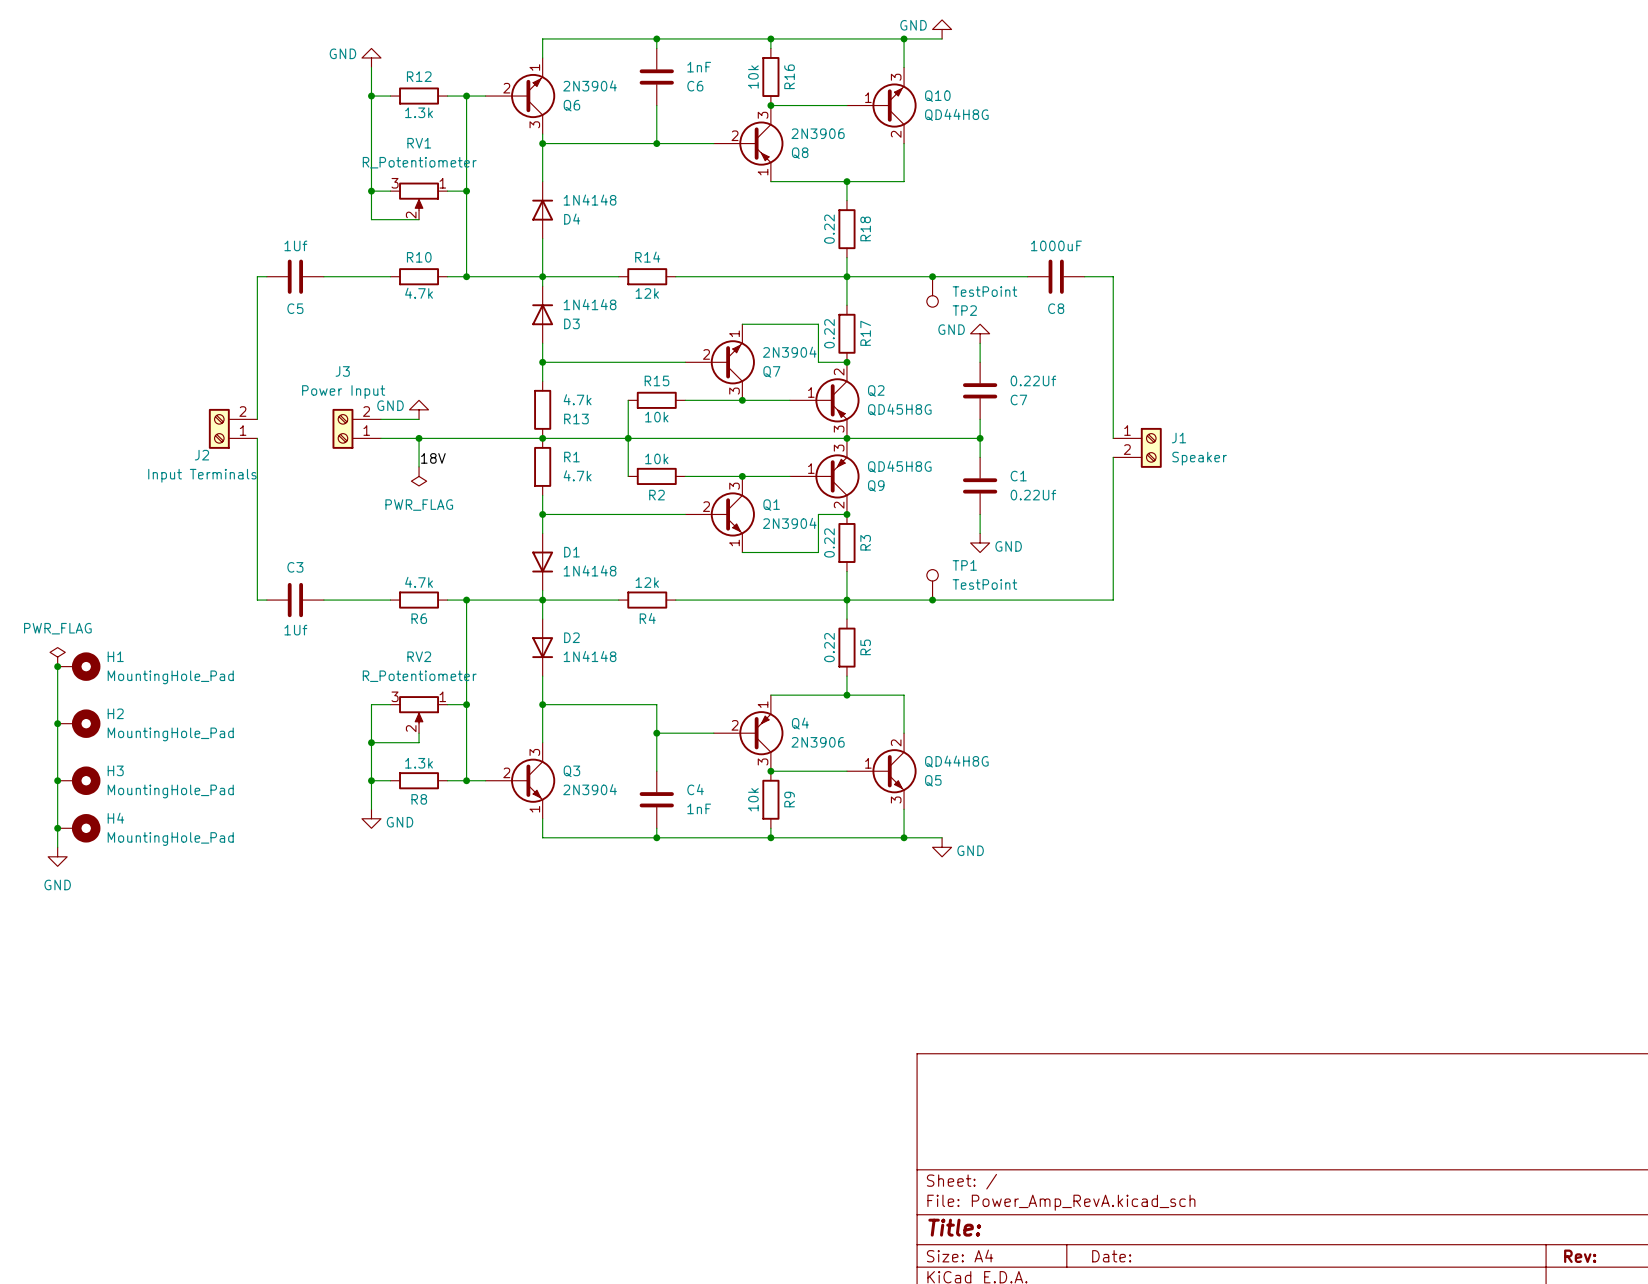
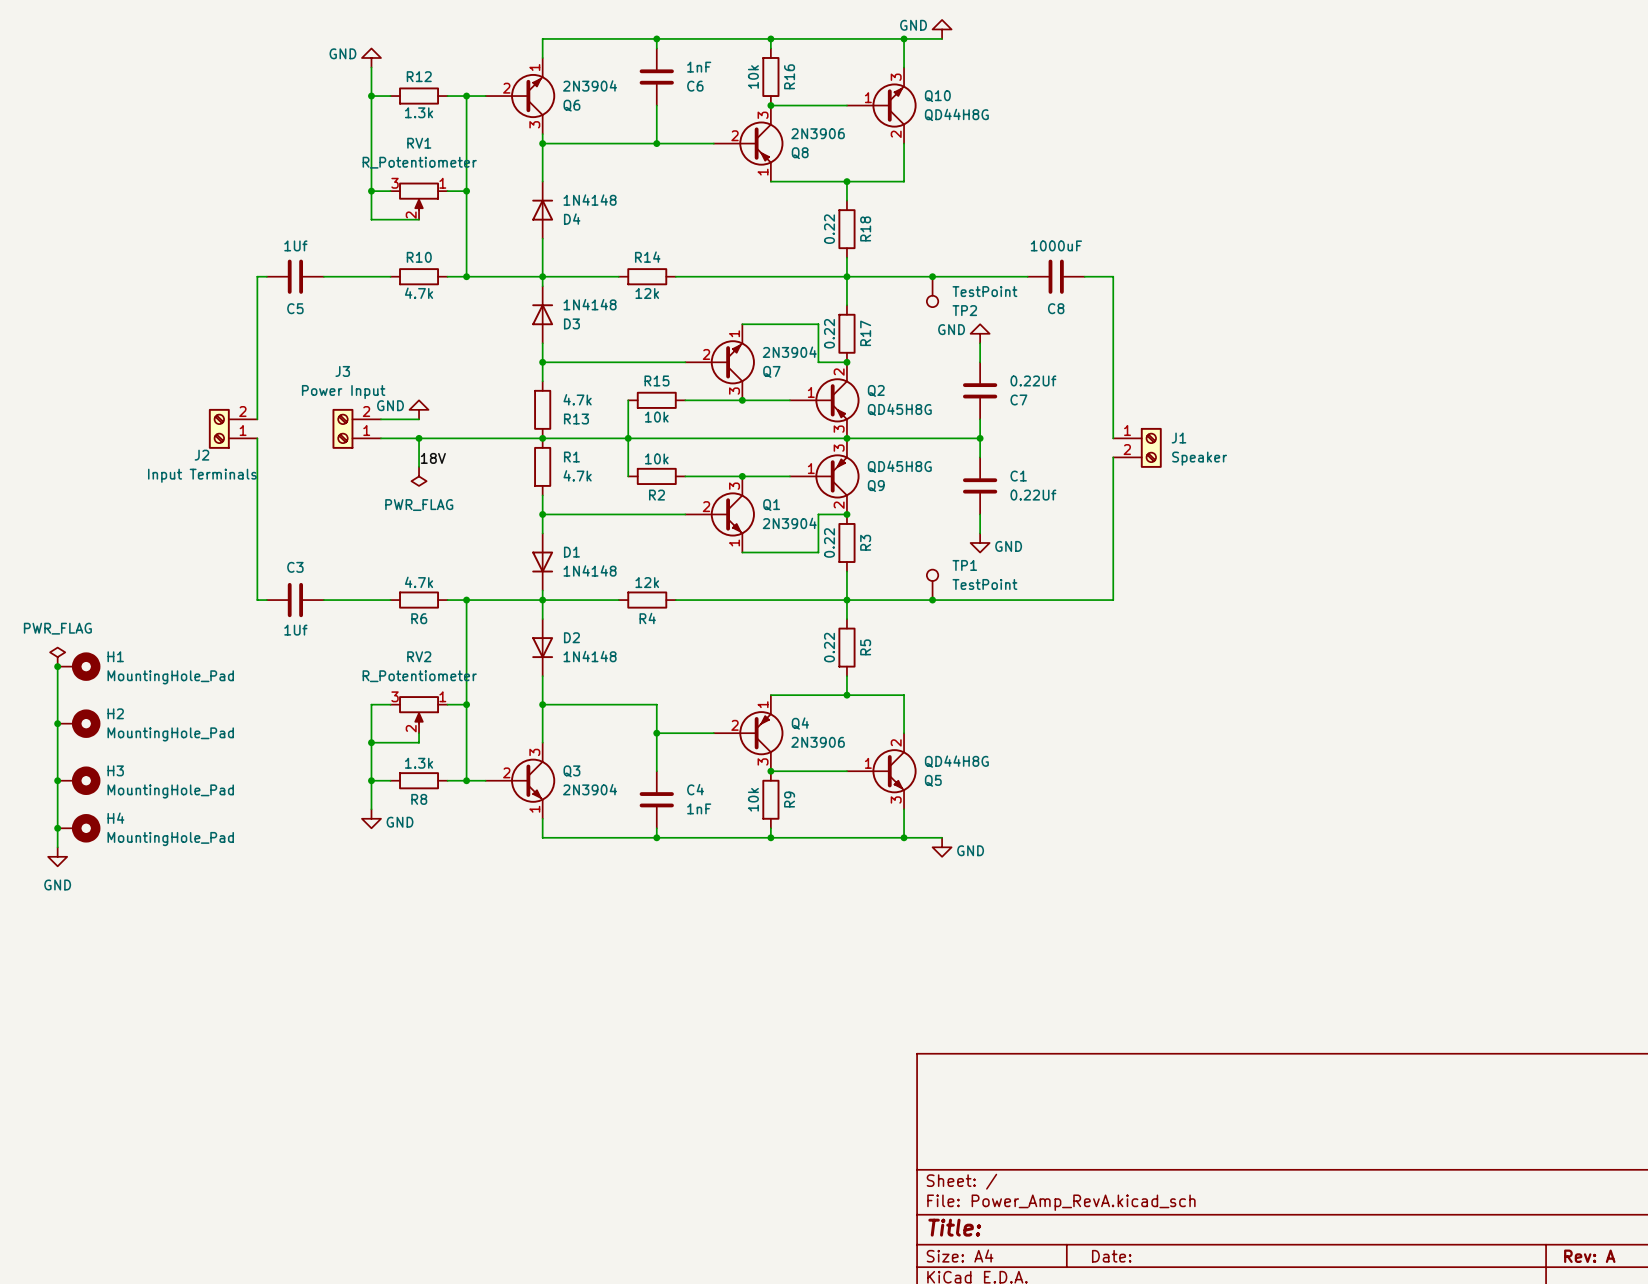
title block: Rev: (1580, 1256) -> Rev: A (1589, 1256)

